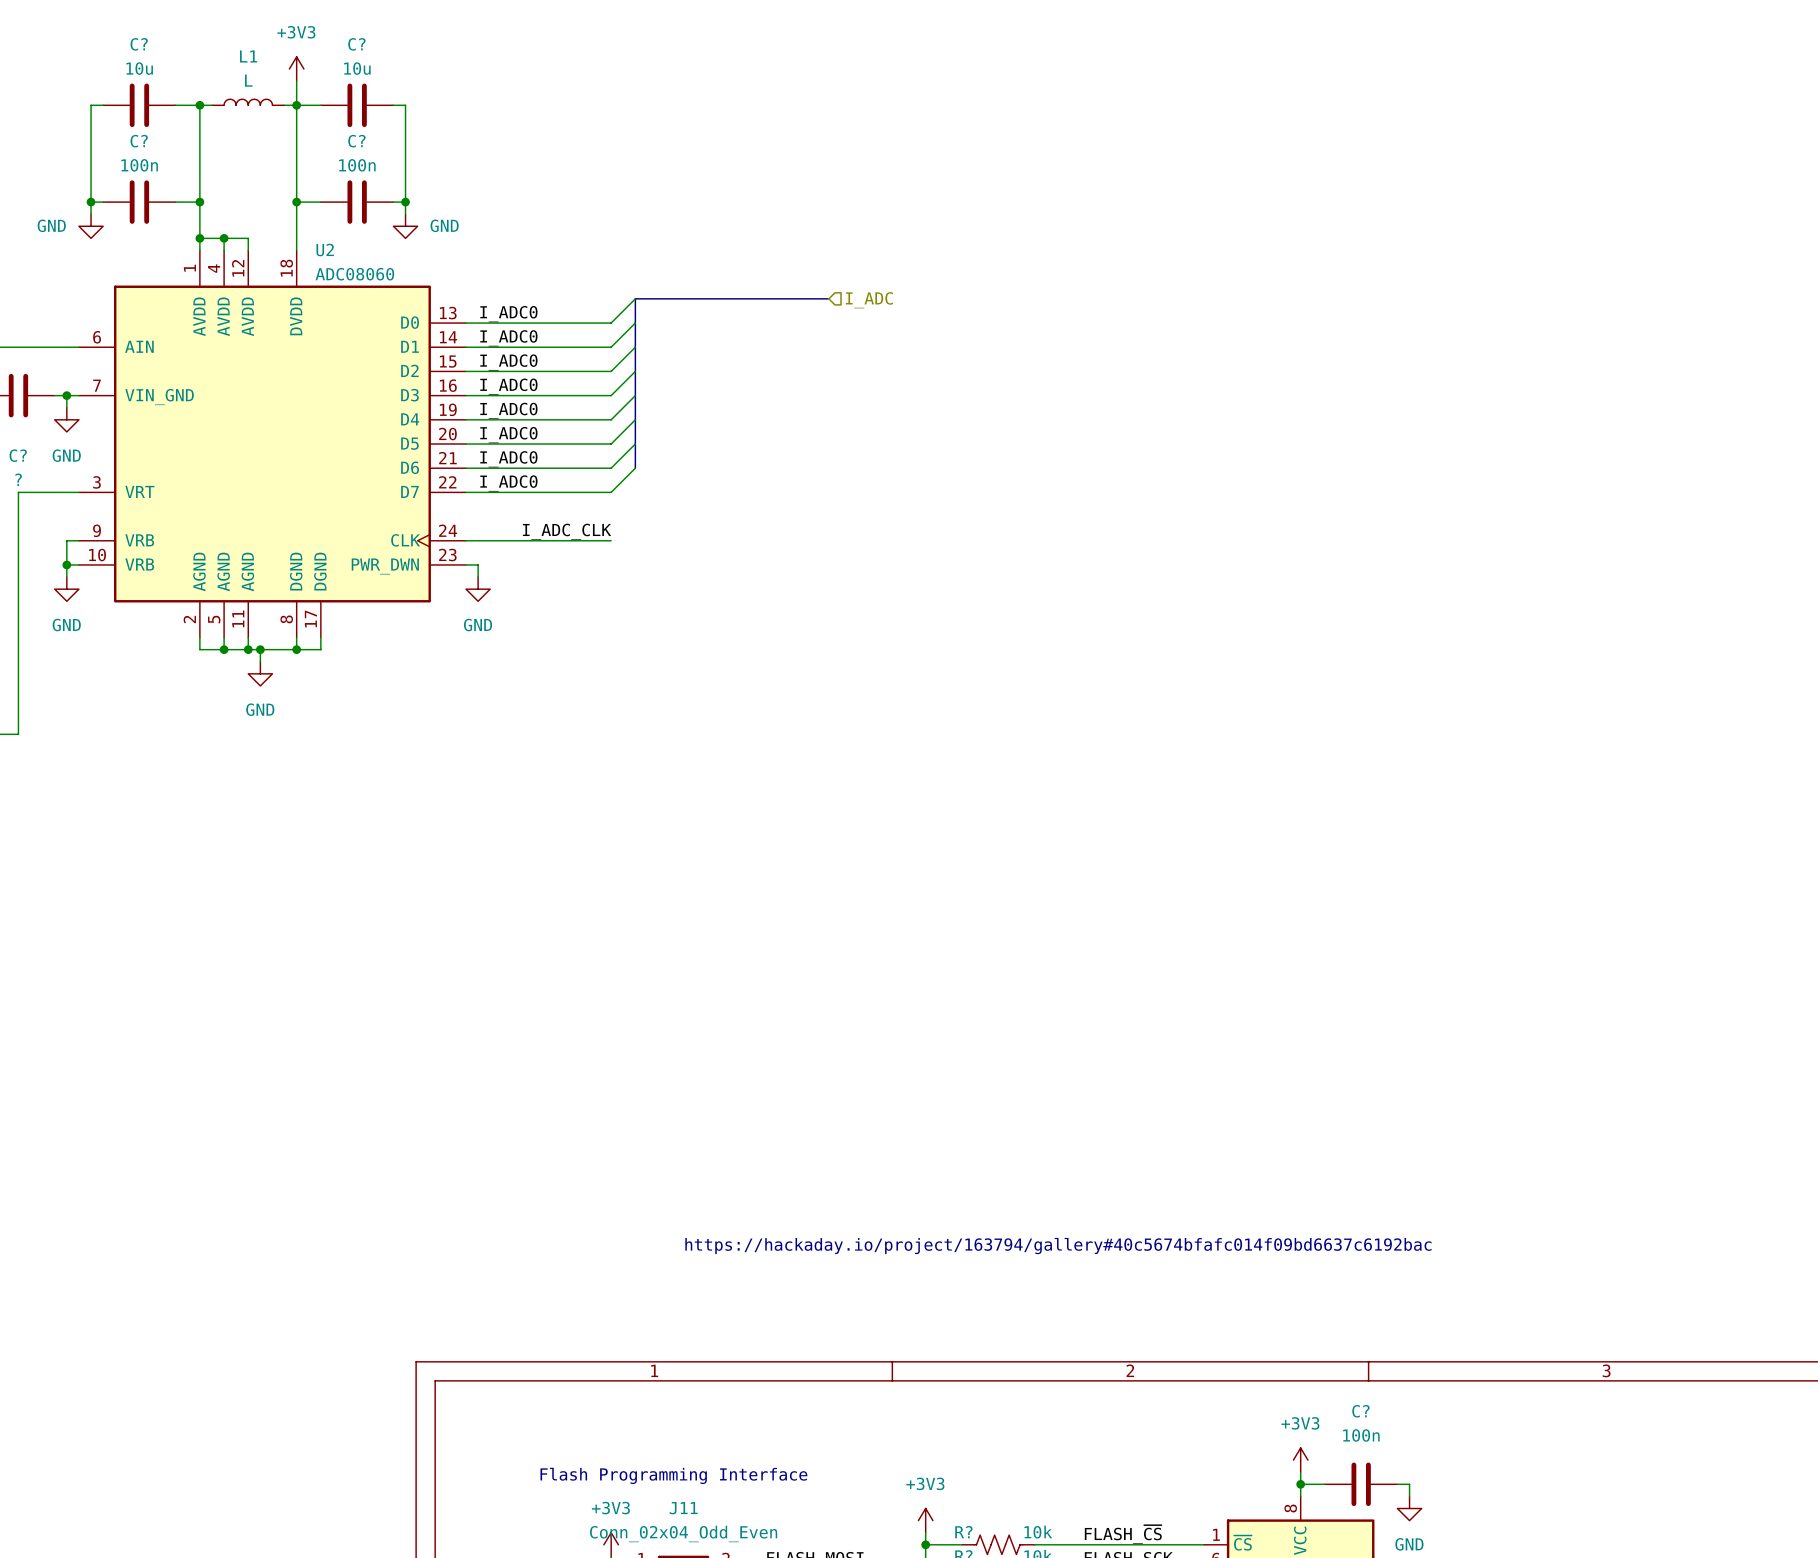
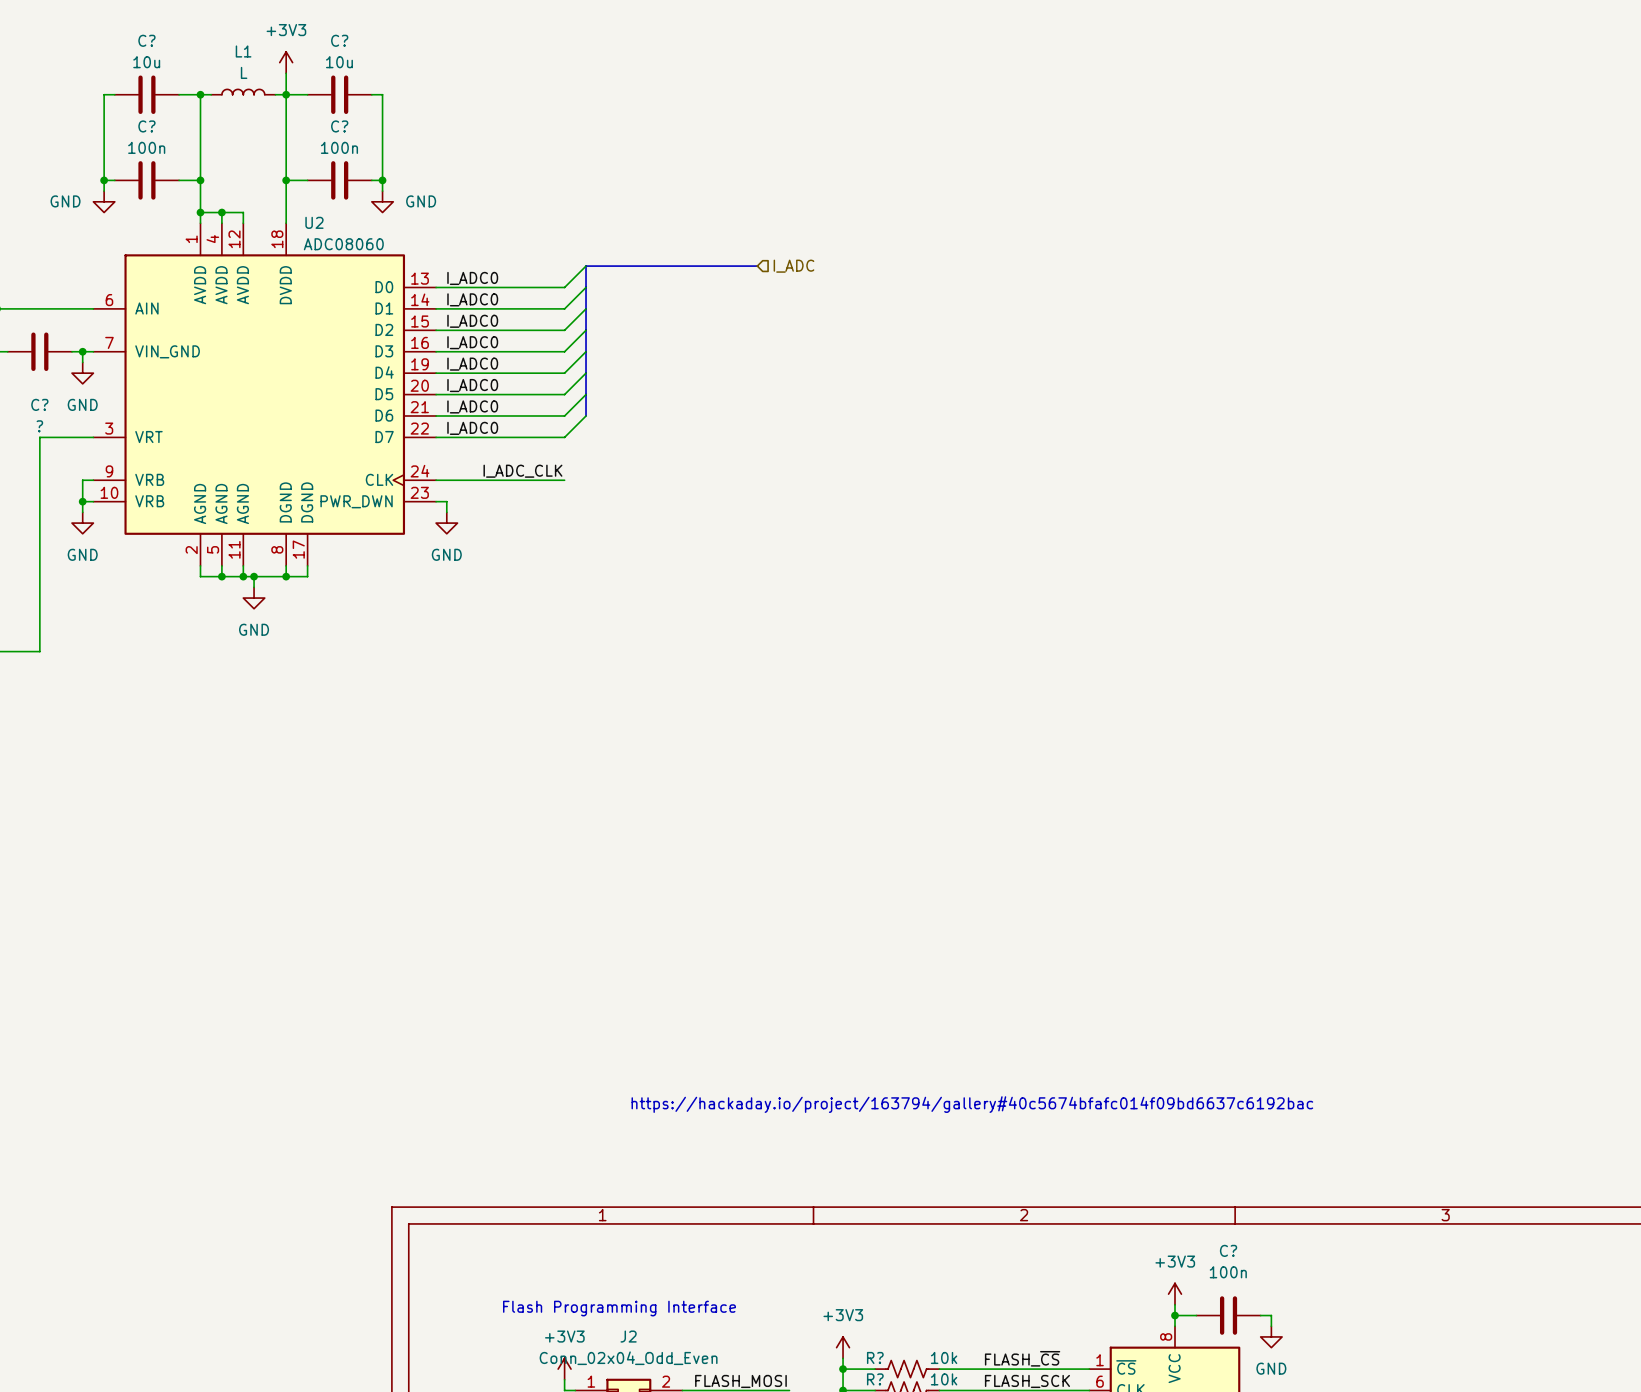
J11 name: J11 (683, 1508) -> J2 (628, 1336)

